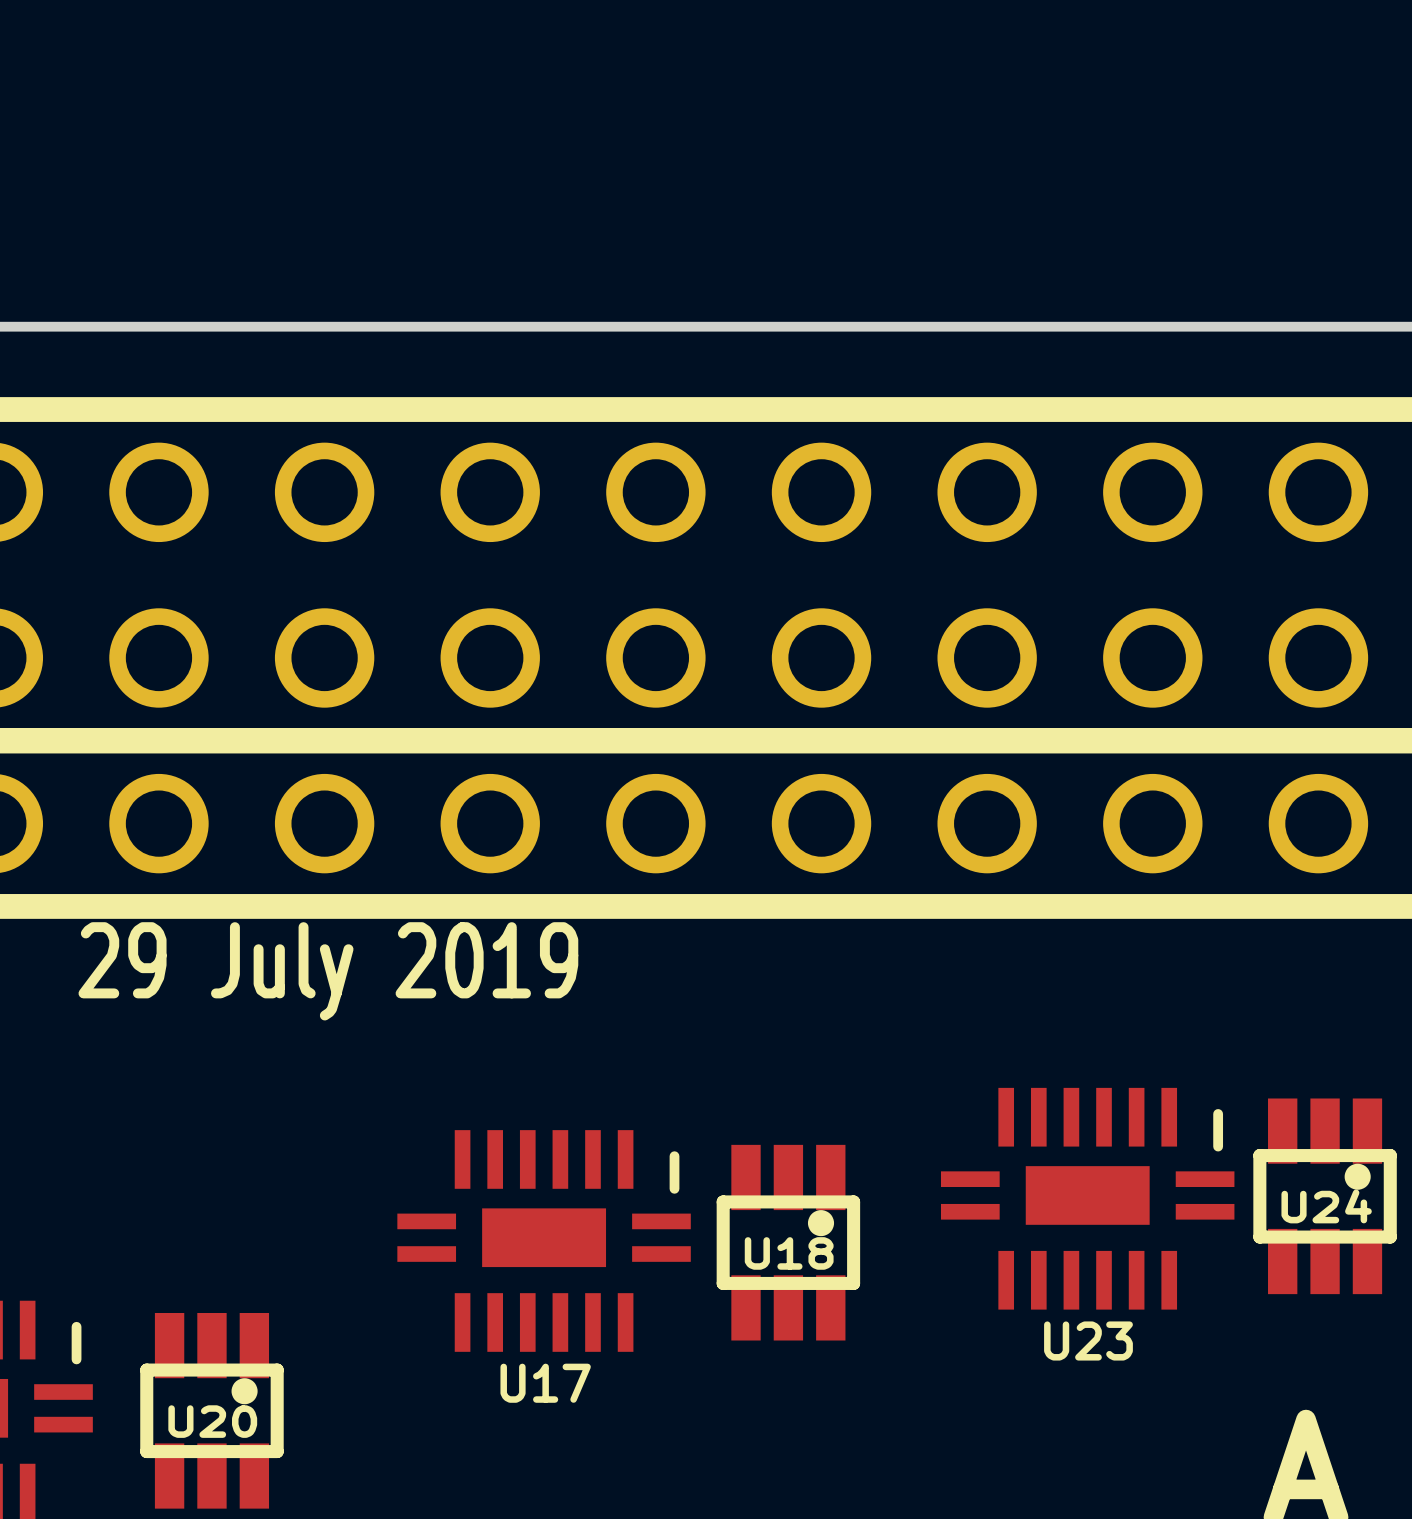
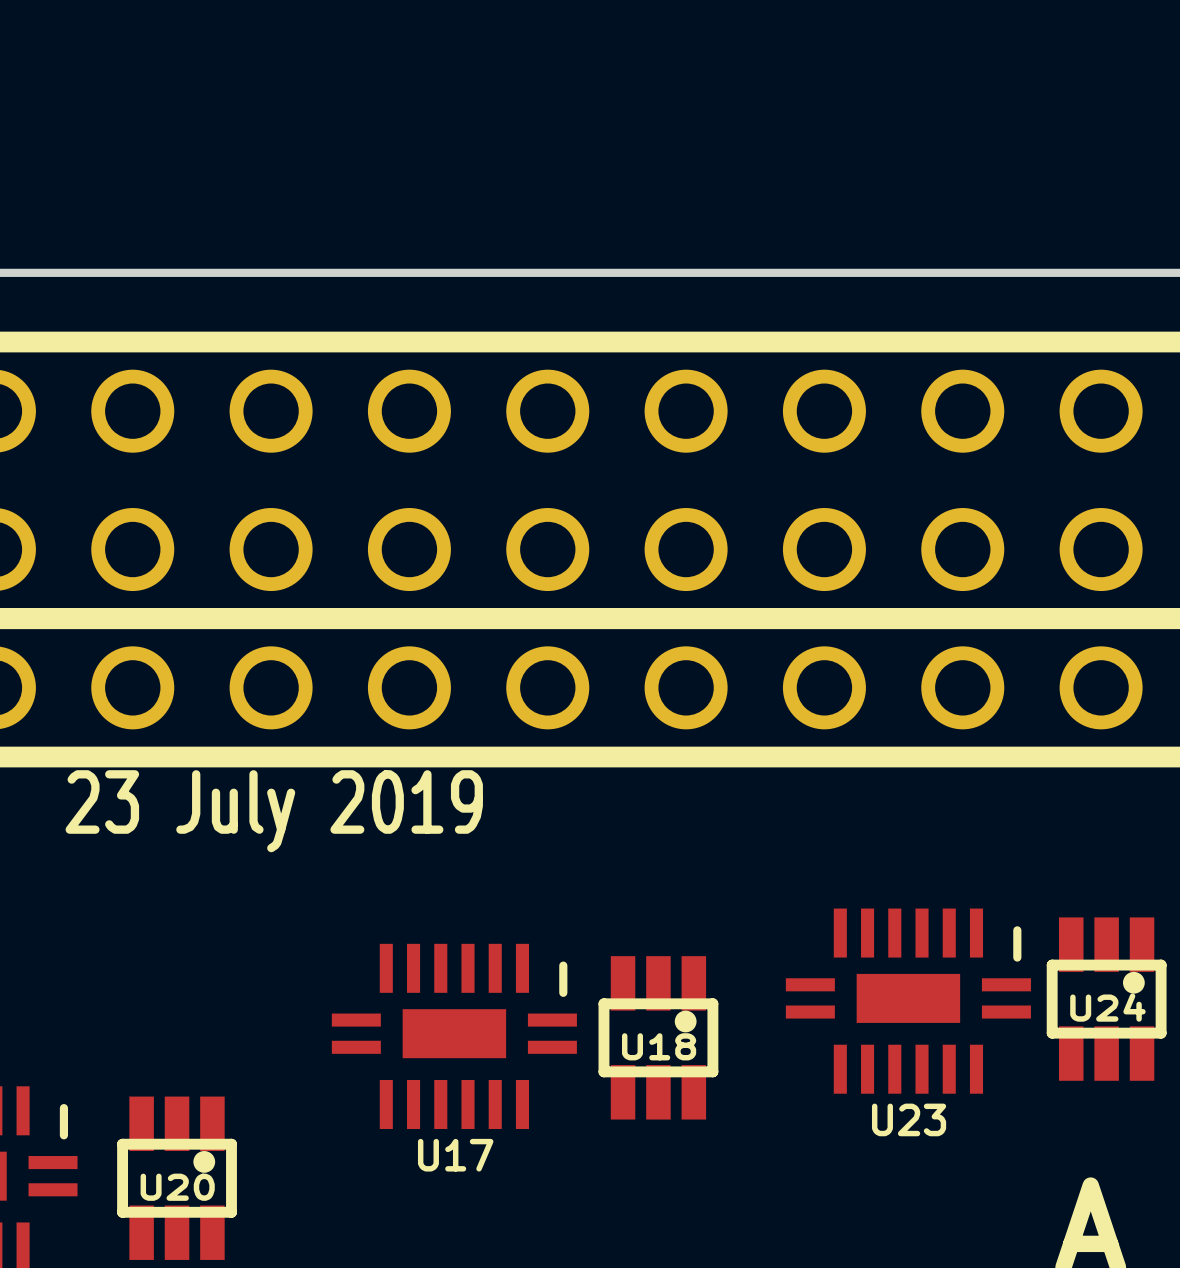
text: 29 July 2019 (328, 971) -> 23 July 2019 (274, 811)

